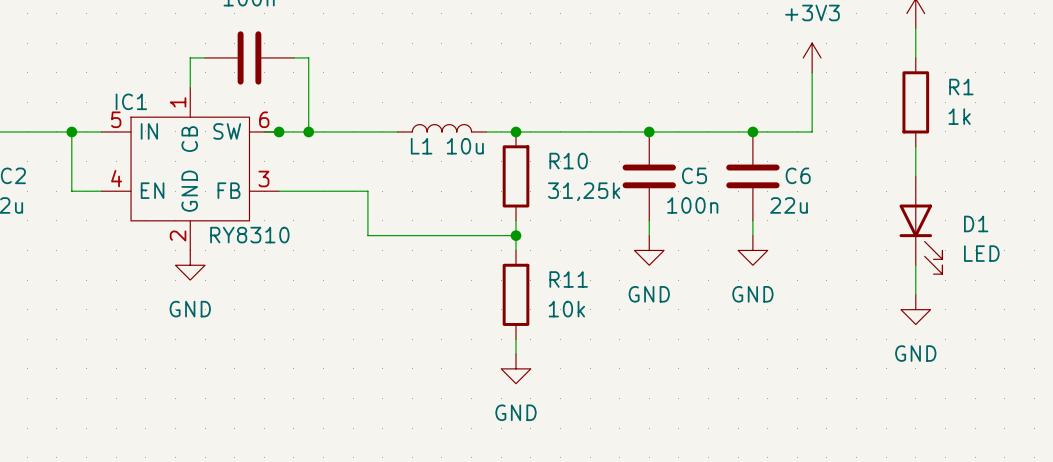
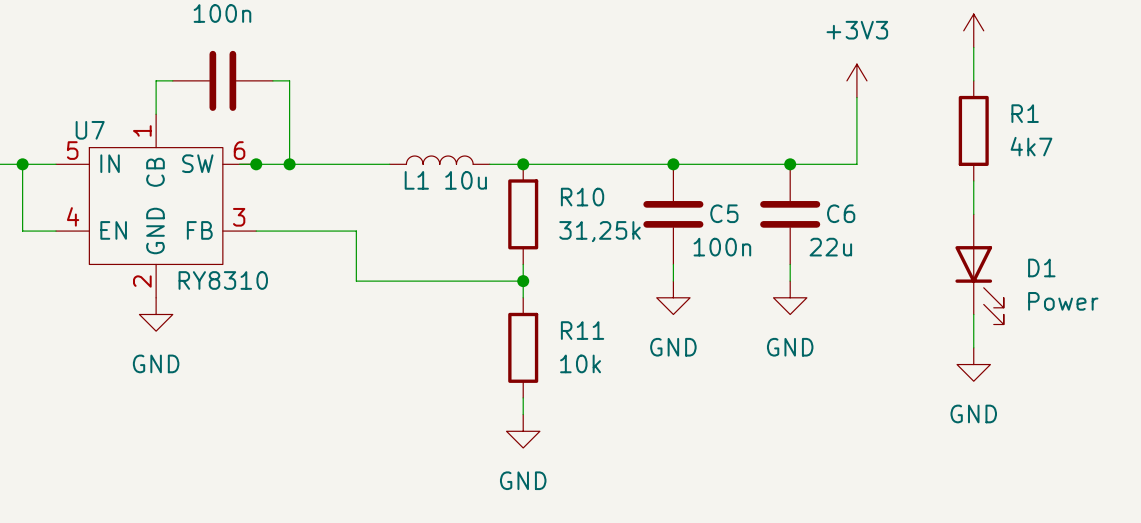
IC1 name: IC1 (131, 101) -> U7 (90, 130)
R1 value: 1k (959, 116) -> 4k7 (1031, 146)
D1 value: LED (981, 253) -> Power (1063, 301)

